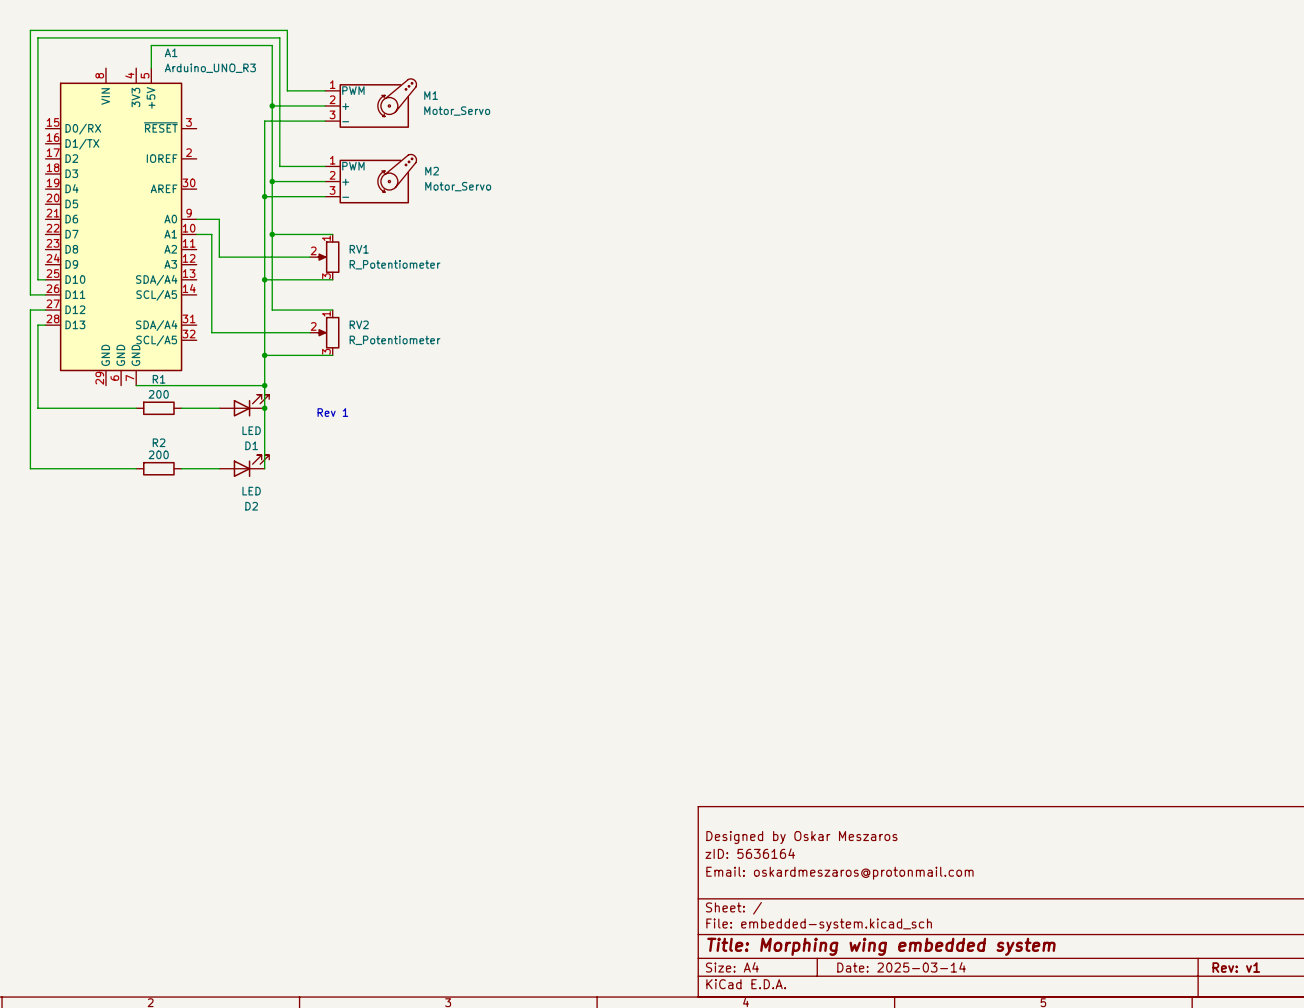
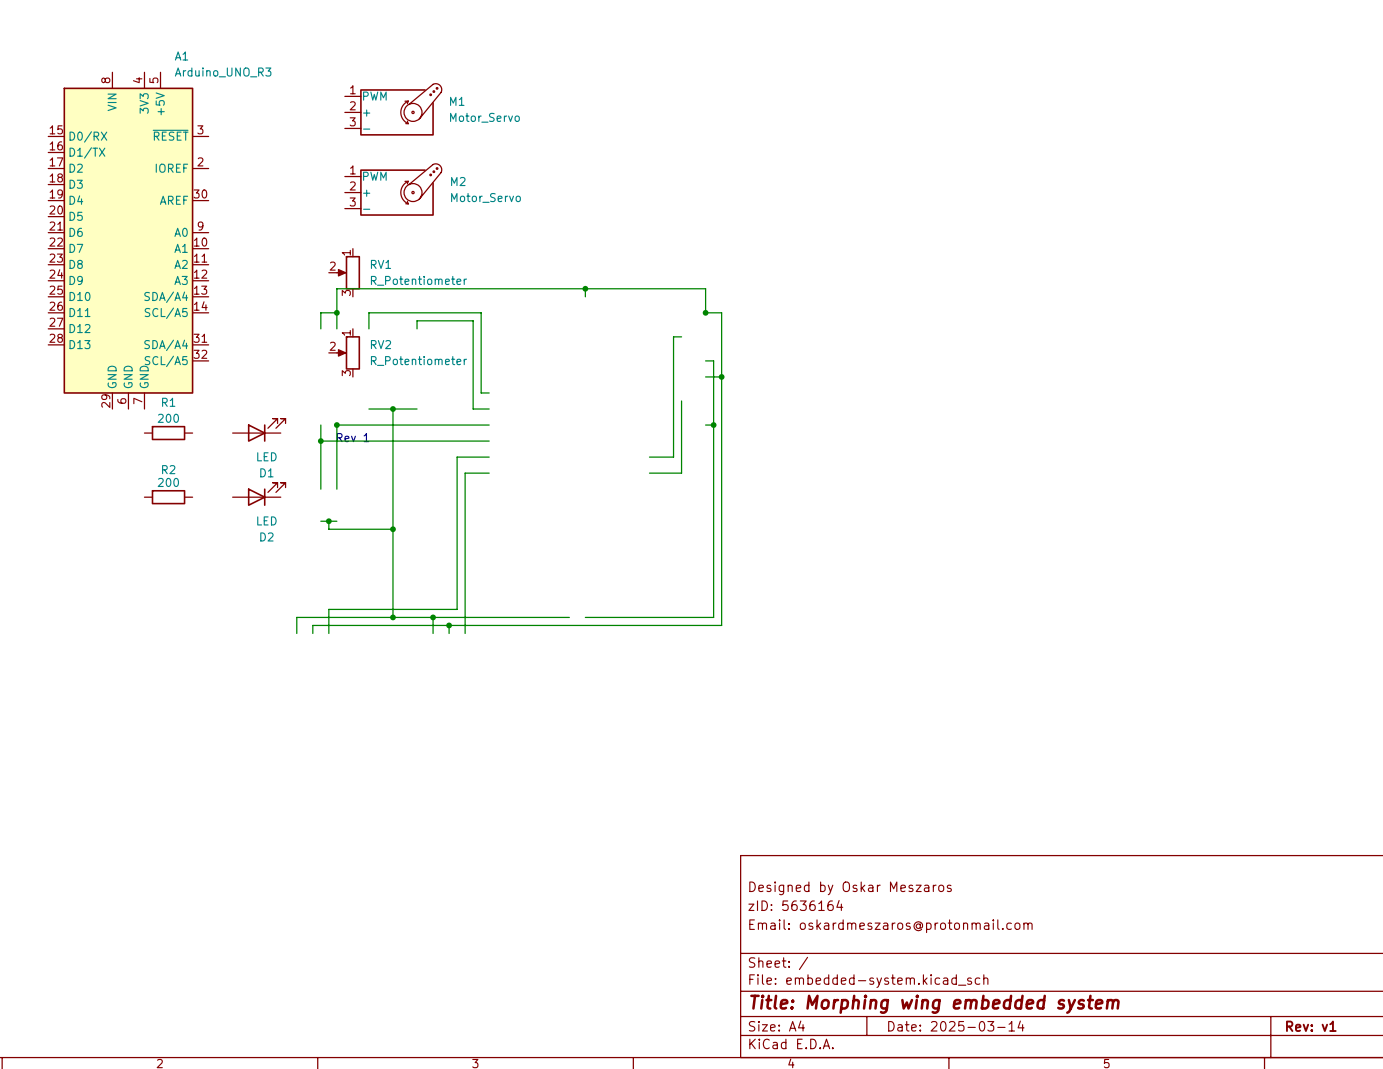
wire: (151, 68) (151, 45) (272, 45) (272, 310) (332, 310) -> none
wire: (325, 90) (287, 90) (287, 30) (30, 30) (30, 294) (45, 294) -> none
wire: (272, 105) (325, 105) -> none
junction: (272, 105) -> none
wire: (325, 121) (264, 121) (264, 468) -> none
wire: (325, 166) (279, 166) (279, 37) (37, 37) (37, 279) (45, 279) -> none
wire: (272, 181) (325, 181) -> none
junction: (272, 181) -> none
wire: (264, 196) (325, 196) -> none
junction: (264, 196) -> none
wire: (196, 219) (219, 219) (219, 257) (310, 257) -> none
wire: (196, 234) (211, 234) (211, 332) (310, 332) -> none
wire: (272, 234) (332, 234) -> none
junction: (272, 234) -> none
wire: none -> (585, 288) (585, 296)
junction: none -> (585, 288)
wire: (264, 279) (332, 279) -> none
junction: (264, 279) -> none
wire: none -> (336, 312) (320, 312) (320, 328)
junction: none -> (336, 312)
junction: none -> (705, 312)
wire: (45, 310) (30, 310) (30, 468) (136, 468) -> none
wire: none -> (336, 328) (336, 288) (705, 288) (705, 312) (721, 312) (721, 625) (312, 625) (312, 633)
wire: none -> (368, 328) (368, 312) (481, 312) (481, 392) (489, 392)
wire: none -> (417, 328) (417, 320) (473, 320) (473, 409) (489, 409)
wire: none -> (681, 336) (673, 336) (673, 457) (649, 457)
wire: (45, 325) (37, 325) (37, 408) (136, 408) -> none
wire: none -> (705, 360) (713, 360) (713, 617) (585, 617)
wire: (264, 355) (332, 355) -> none
junction: (264, 355) -> none
wire: none -> (705, 376) (721, 376)
junction: none -> (721, 376)
wire: none -> (681, 400) (681, 473) (649, 473)
wire: (136, 385) (264, 385) -> none
junction: (264, 385) -> none
wire: none -> (368, 409) (417, 409)
wire: none -> (392, 409) (392, 617)
junction: none -> (392, 409)
wire: none -> (320, 425) (320, 489)
junction: none -> (336, 425)
wire: none -> (489, 425) (336, 425) (336, 489)
wire: none -> (705, 425) (713, 425)
junction: none -> (713, 425)
wire: (181, 408) (219, 408) -> none
junction: (264, 408) -> none
wire: none -> (320, 441) (489, 441)
junction: none -> (320, 441)
wire: none -> (489, 457) (457, 457) (457, 609) (328, 609) (328, 633)
wire: none -> (489, 473) (465, 473) (465, 633)
wire: (181, 468) (219, 468) -> none
wire: none -> (320, 521) (336, 521)
wire: none -> (328, 521) (328, 529) (392, 529)
junction: none -> (328, 521)
junction: none -> (392, 529)
junction: none -> (392, 617)
wire: none -> (433, 617) (433, 633)
junction: none -> (433, 617)
wire: none -> (569, 617) (296, 617) (296, 633)
wire: none -> (449, 625) (449, 633)
junction: none -> (449, 625)

